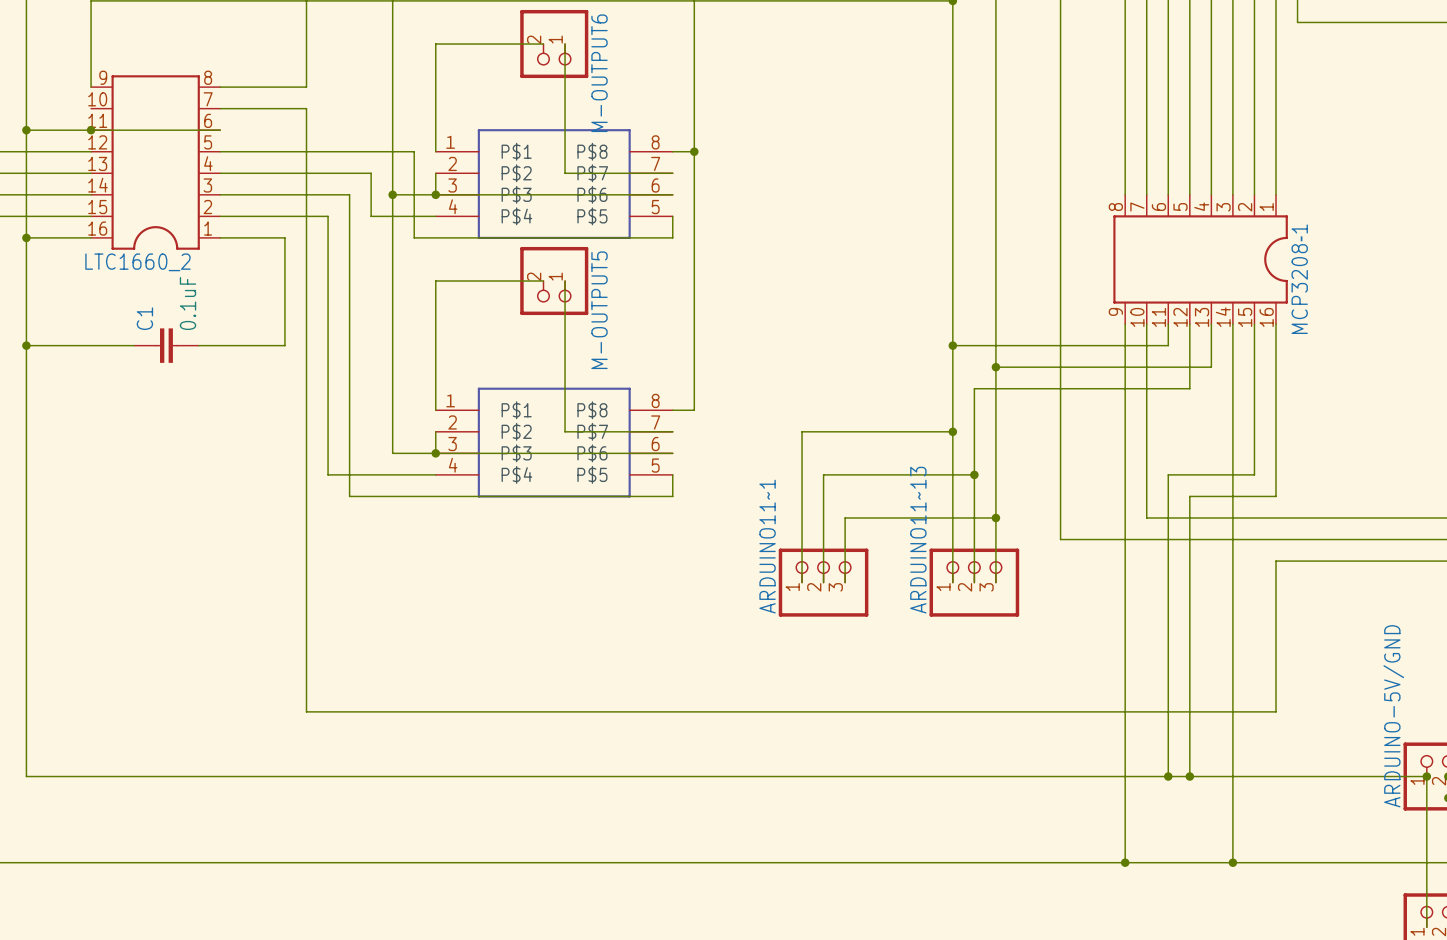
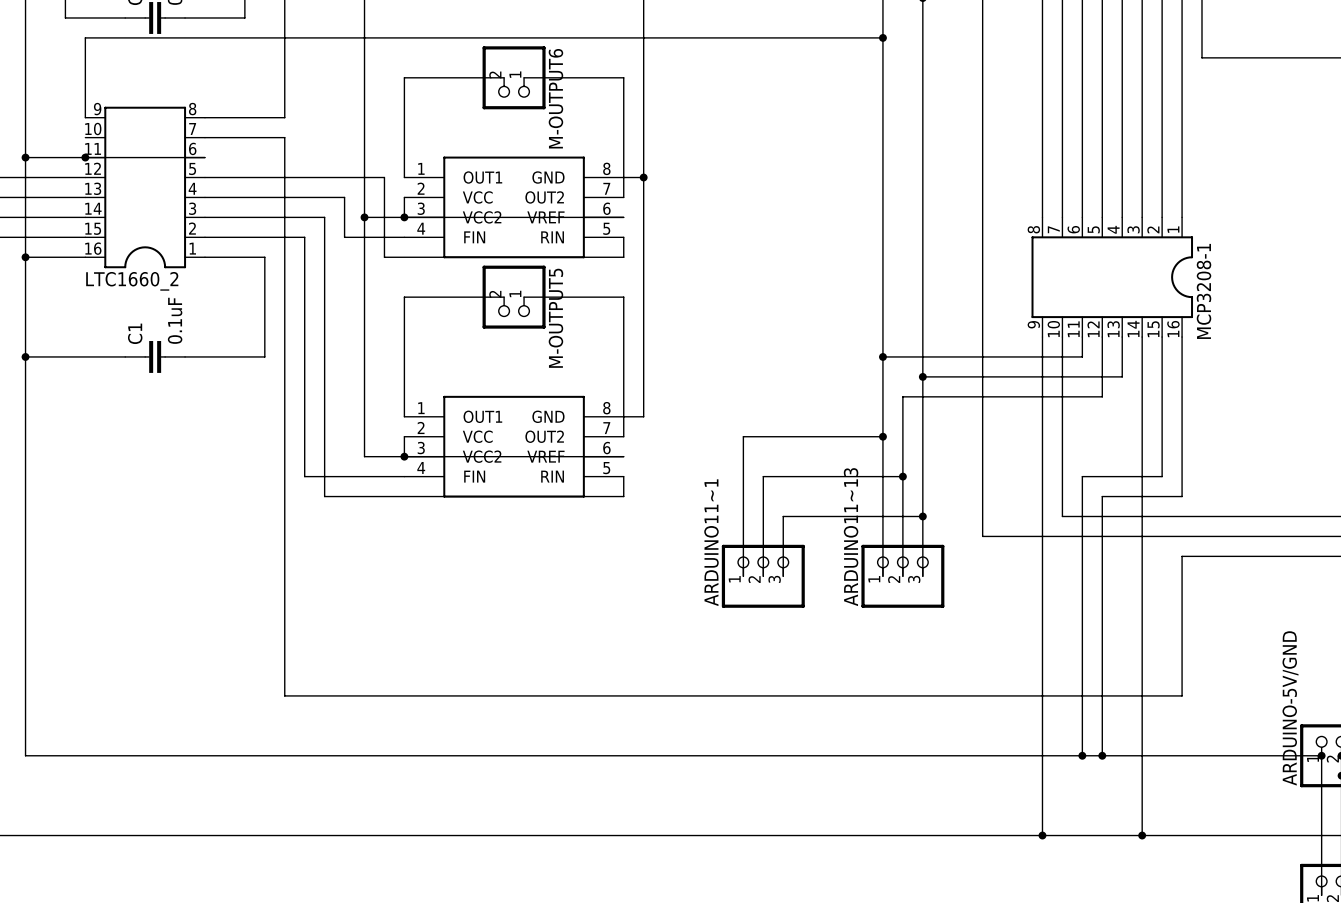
wire: (565, 44) (565, 173) (672, 173) -> (524, 77) (623, 77) (623, 197)
part symbol: [435, 129, 673, 239] -> [404, 156, 624, 259]
wire: (565, 281) (565, 431) (672, 431) -> (524, 297) (623, 297) (623, 436)
part symbol: [435, 387, 673, 498] -> [404, 395, 624, 498]

